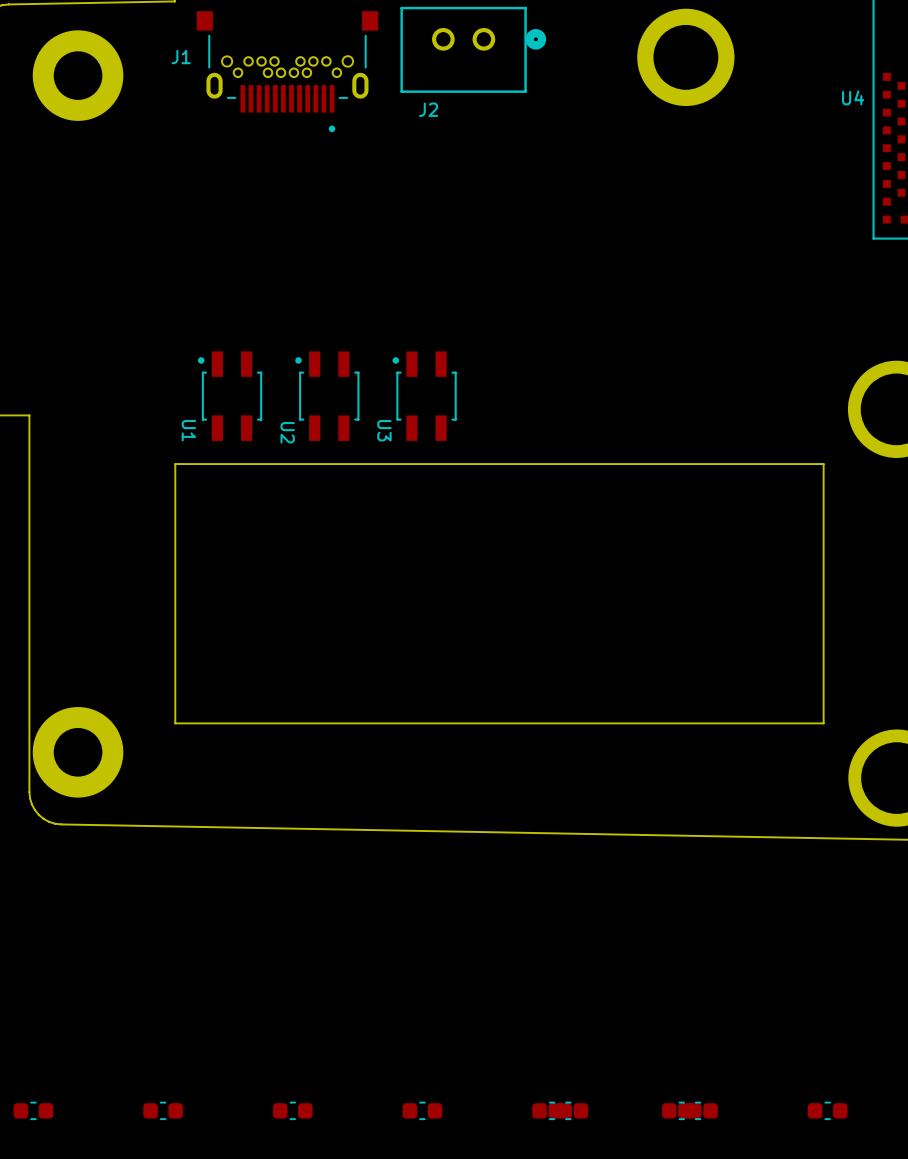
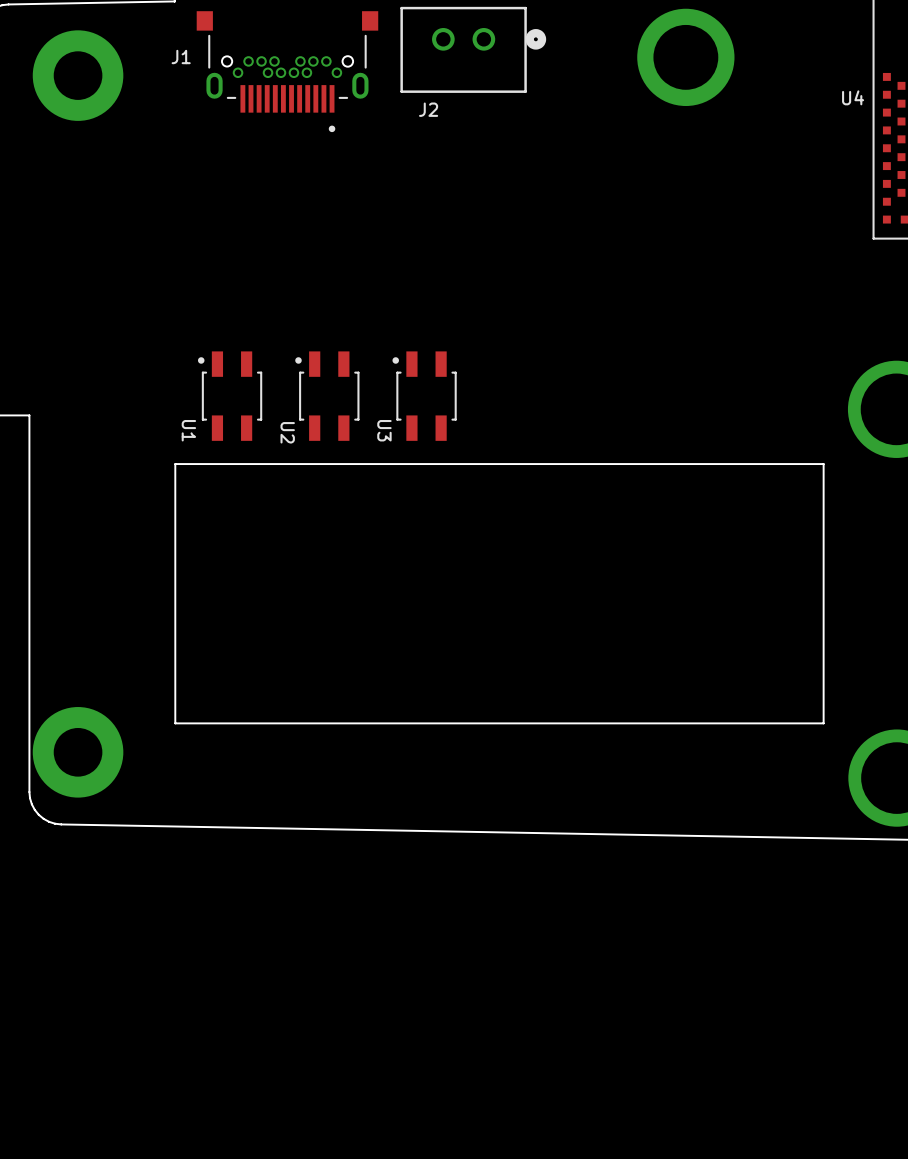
part: (33, 1110) -> none
part: (163, 1110) -> none
part: (292, 1110) -> none
part: (422, 1110) -> none
part: (552, 1110) -> none
part: (568, 1110) -> none
part: (681, 1110) -> none
part: (698, 1110) -> none
part: (827, 1110) -> none

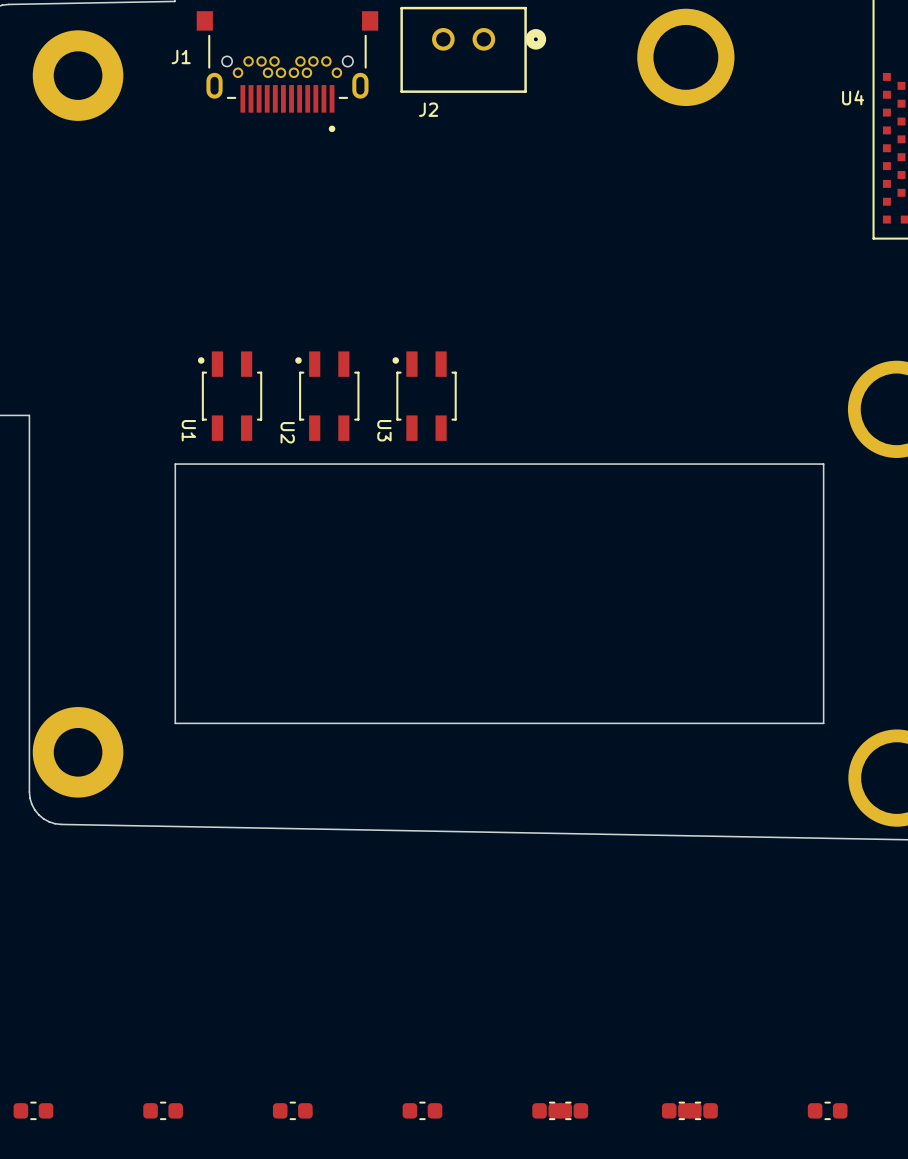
part: none -> (33, 1110)
part: none -> (163, 1110)
part: none -> (292, 1110)
part: none -> (422, 1110)
part: none -> (552, 1110)
part: none -> (568, 1110)
part: none -> (681, 1110)
part: none -> (698, 1110)
part: none -> (827, 1110)

